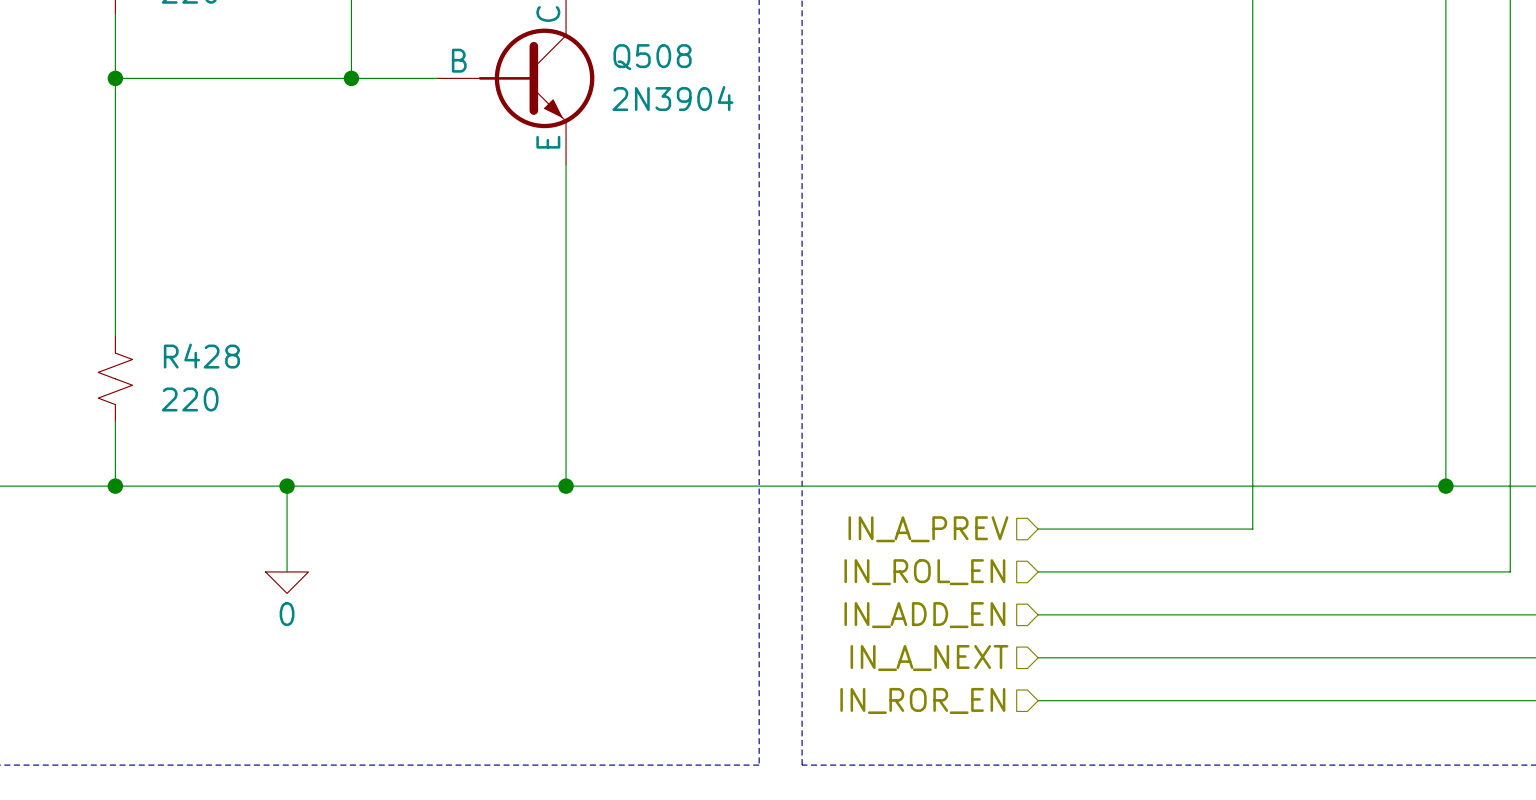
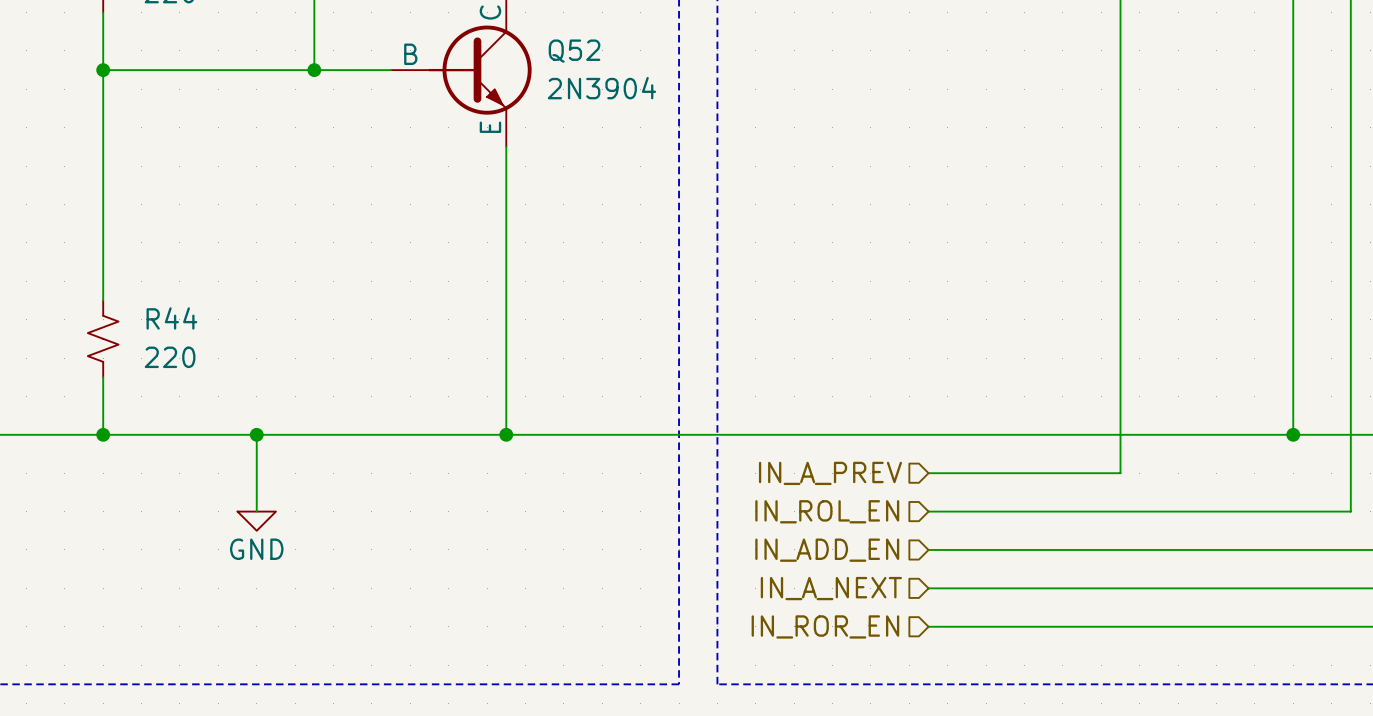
Q508 name: Q508 (652, 57) -> Q52 (574, 51)
R428 name: R428 (201, 356) -> R44 (171, 318)
power symbol: 0 (287, 582) -> GND (256, 521)

